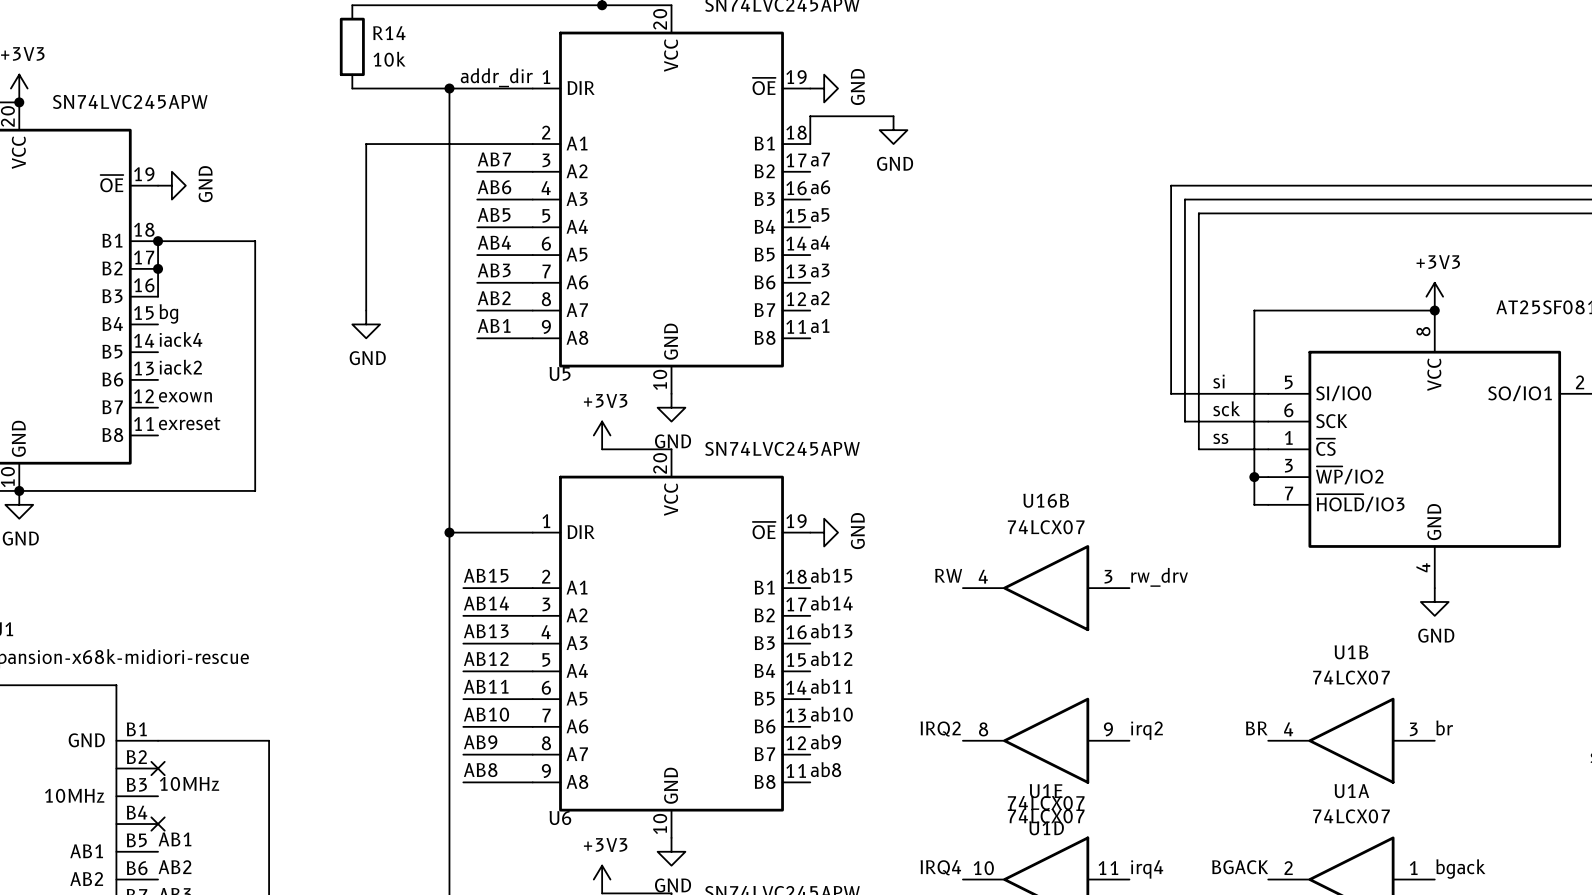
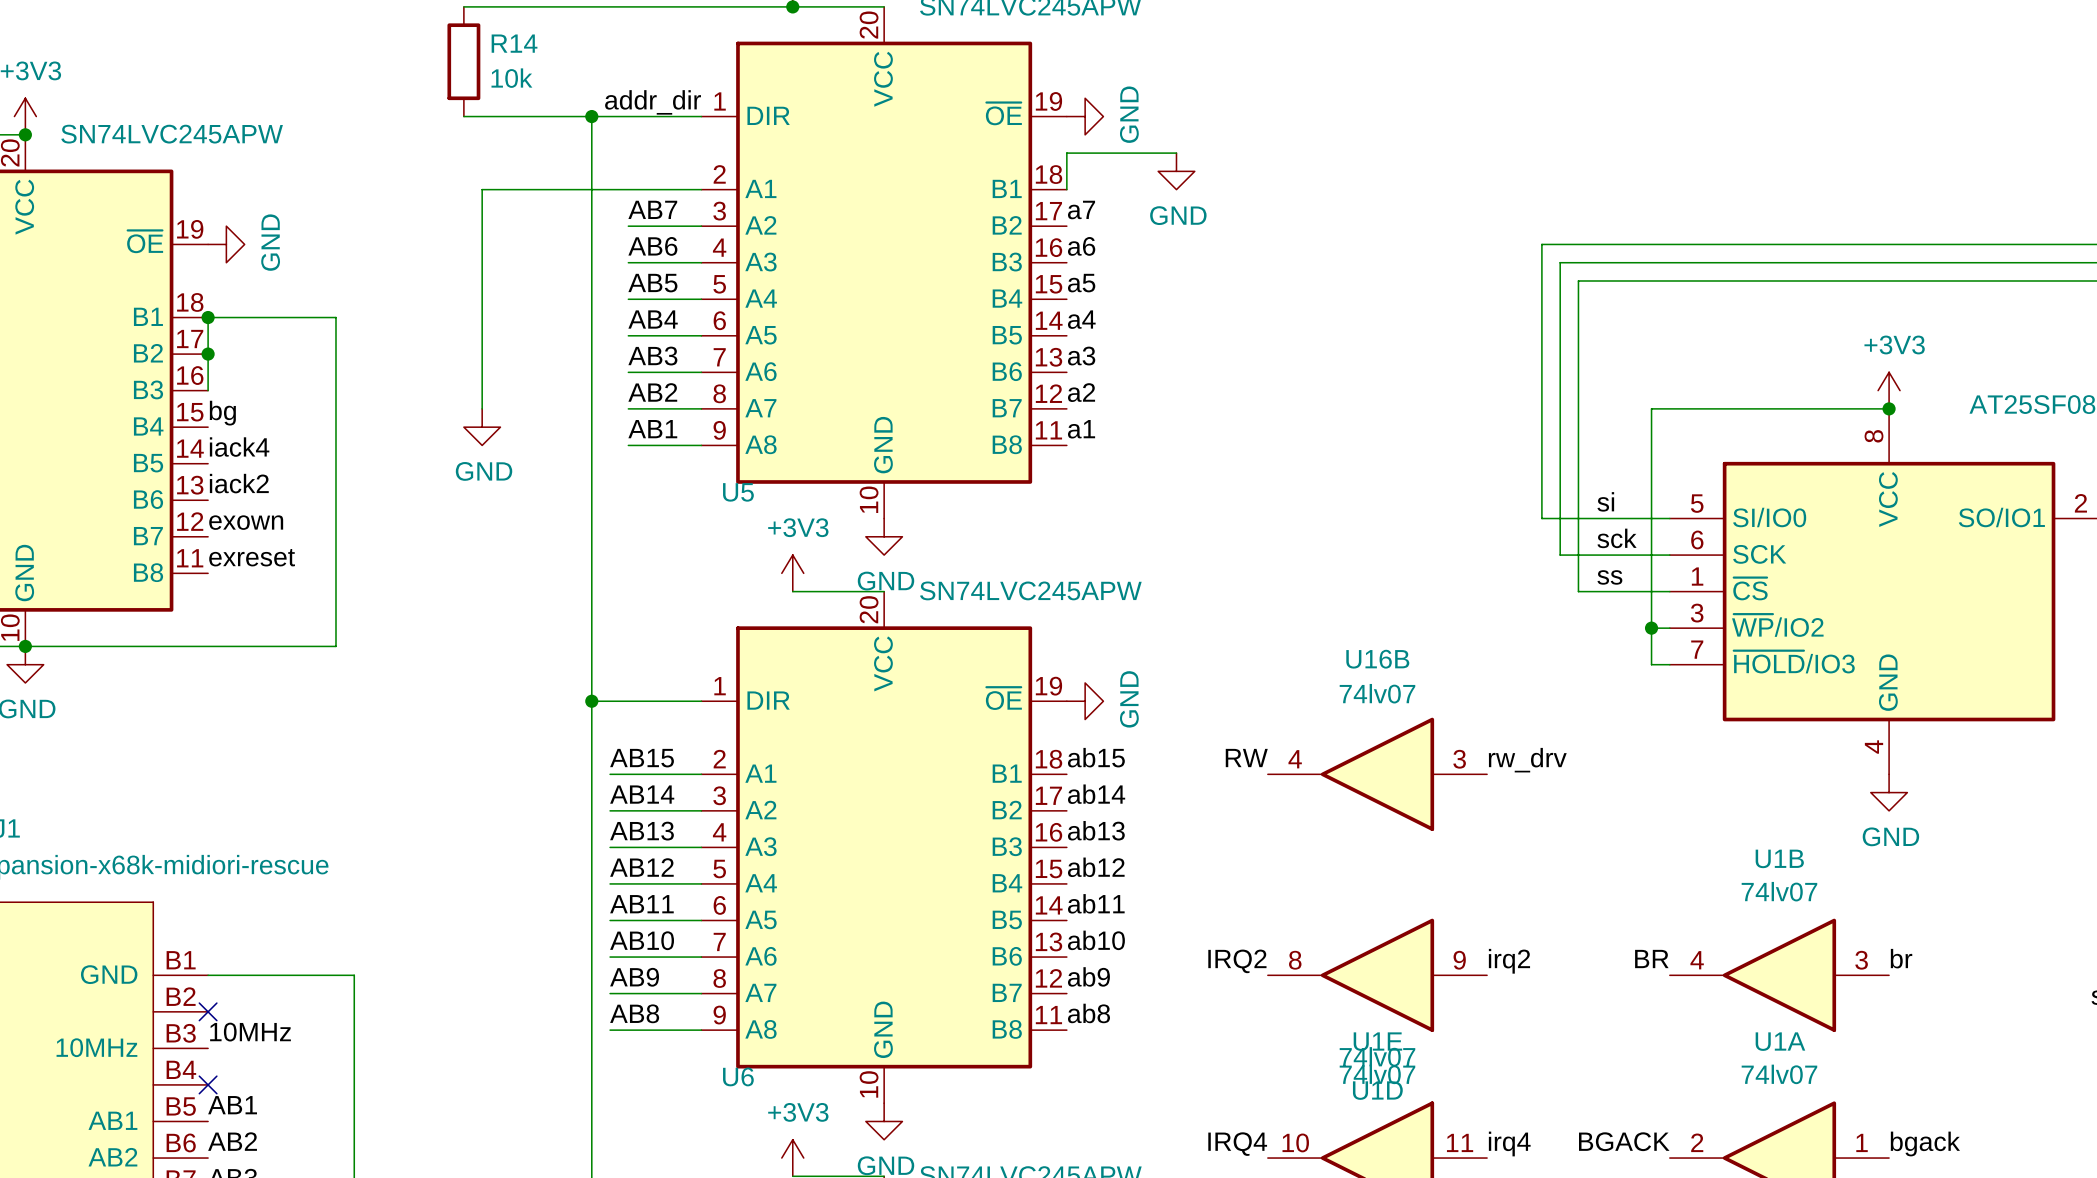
U16B value: 74LCX07 (1046, 527) -> 74lv07 (1377, 693)
U1B value: 74LCX07 (1351, 677) -> 74lv07 (1779, 891)
U1D value: 74LCX07 (1046, 803) -> 74lv07 (1377, 1056)
U1E value: 74LCX07 (1046, 816) -> 74lv07 (1377, 1074)
U1A value: 74LCX07 (1351, 816) -> 74lv07 (1779, 1074)

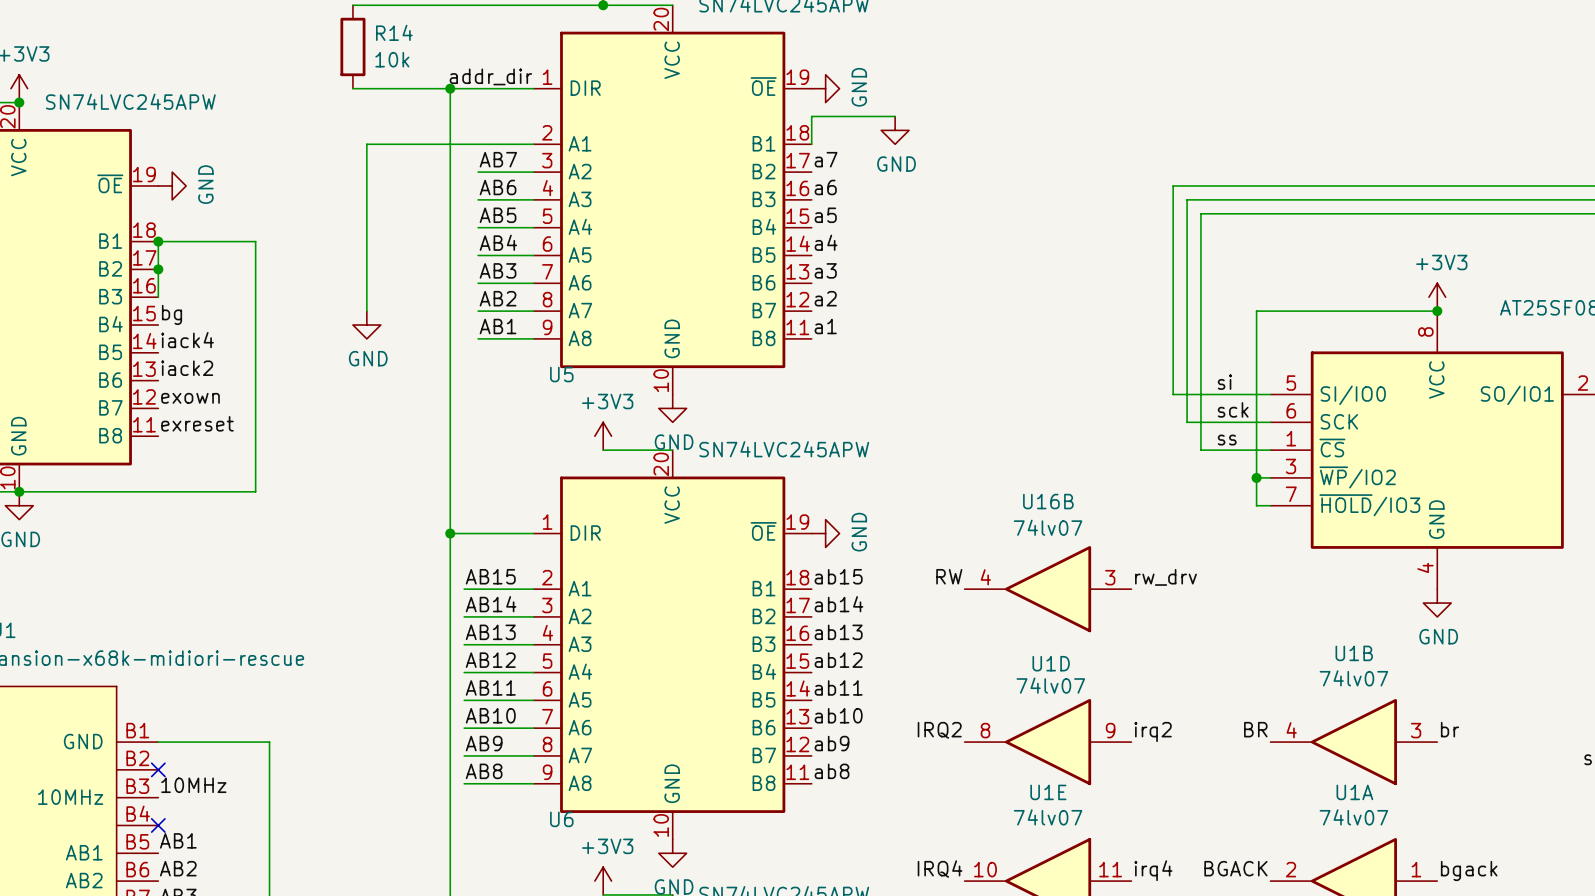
U1D value position: 74lv07 (1377, 1056) -> 74lv07 (1050, 685)
U1D name position: U1D (1377, 1090) -> U1D (1051, 663)

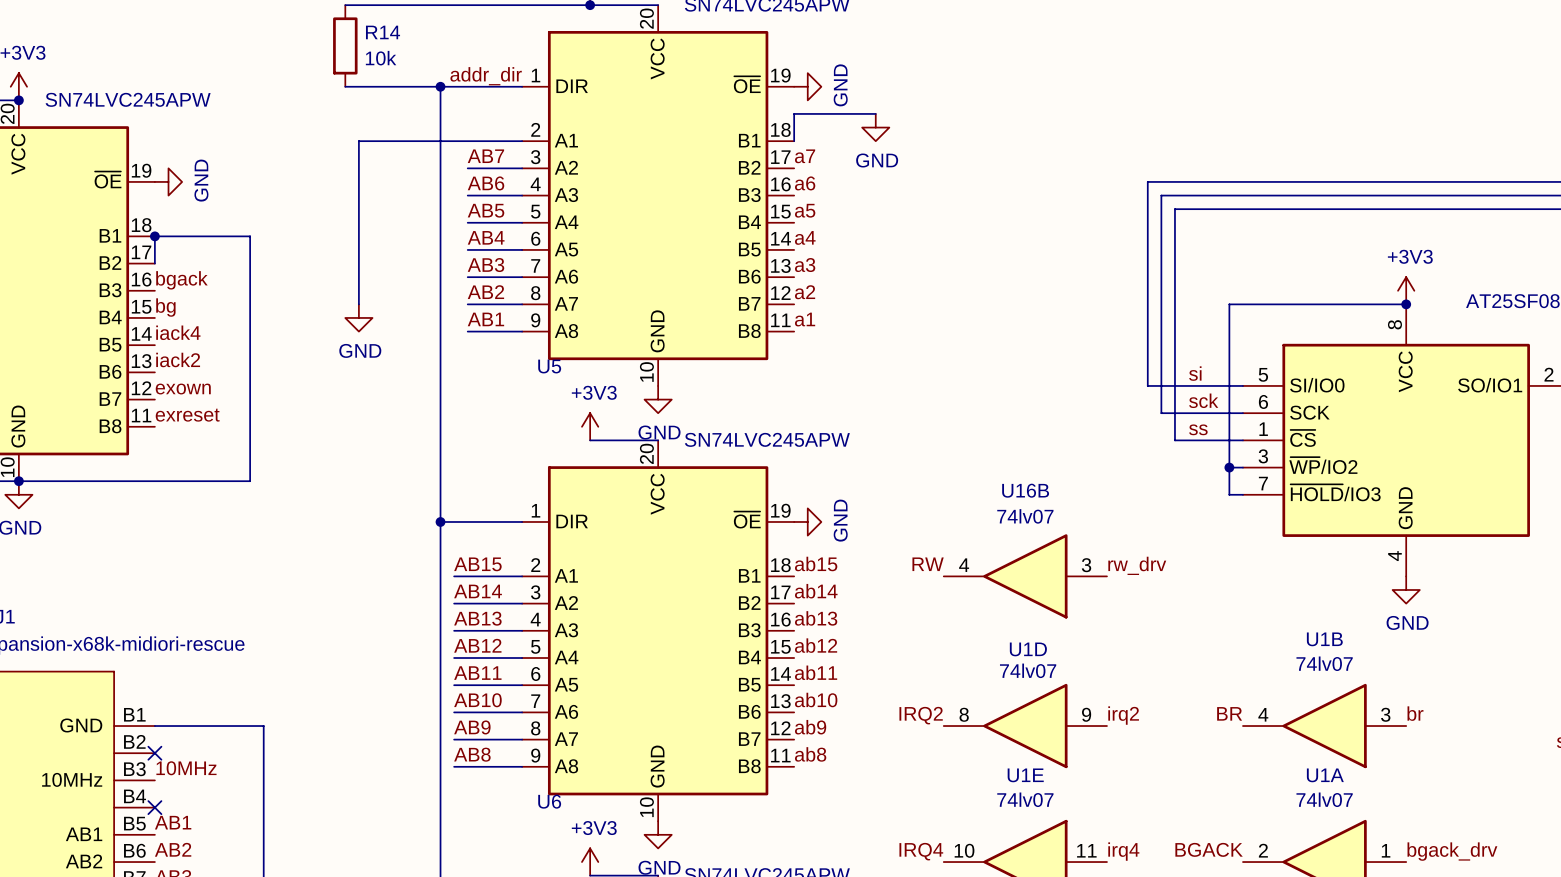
wire: (158, 269) (158, 297) -> none
junction: (158, 269) -> none
label: none -> bgack (181, 280)
label: bgack (1469, 870) -> bgack_drv (1452, 851)

